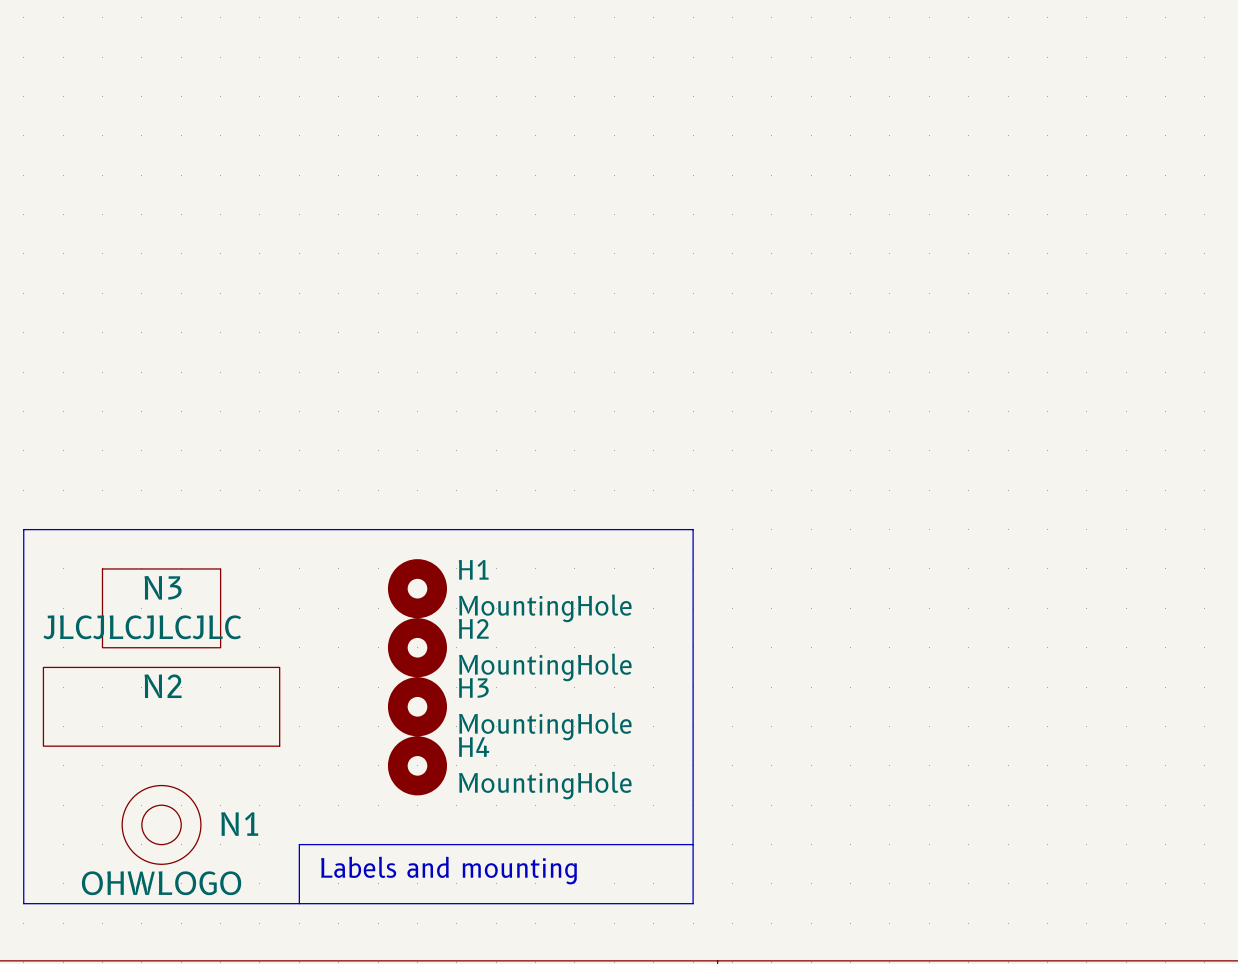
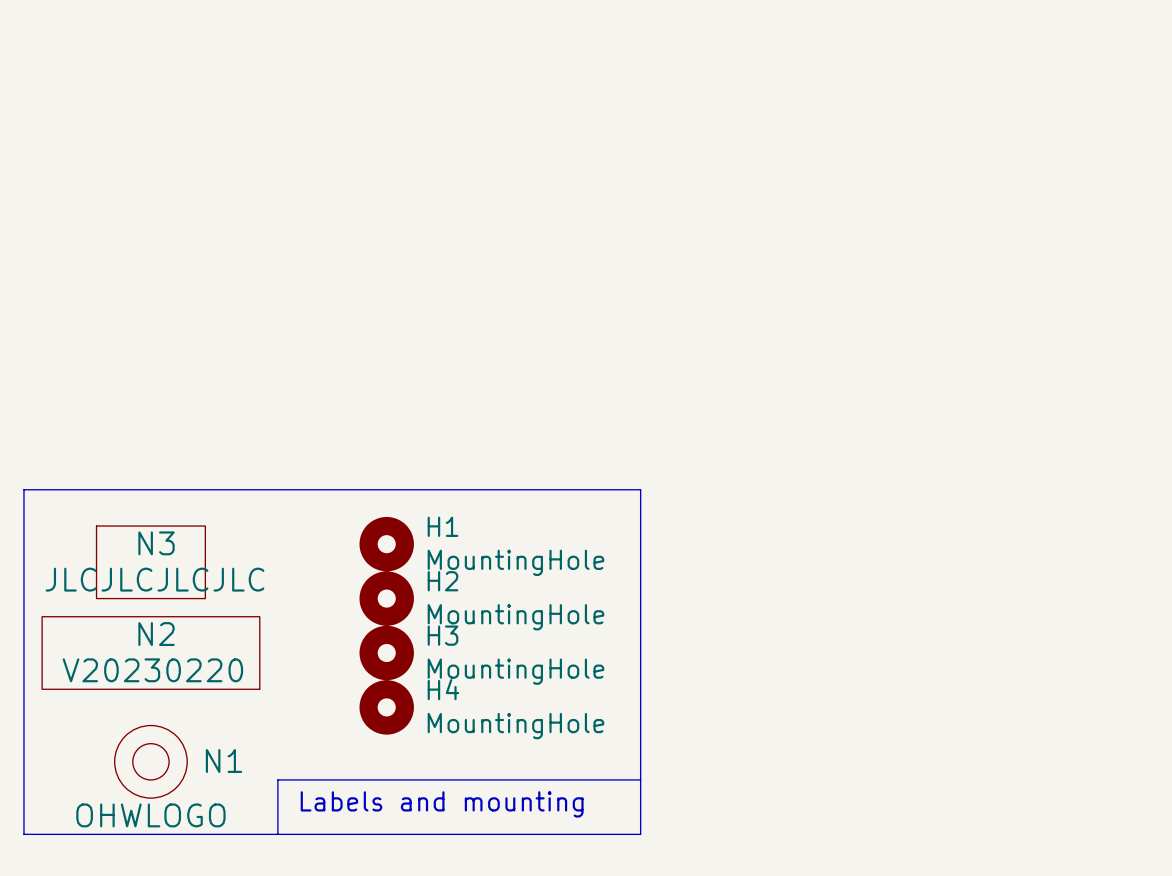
N2 value: none -> V20230220 (152, 670)

